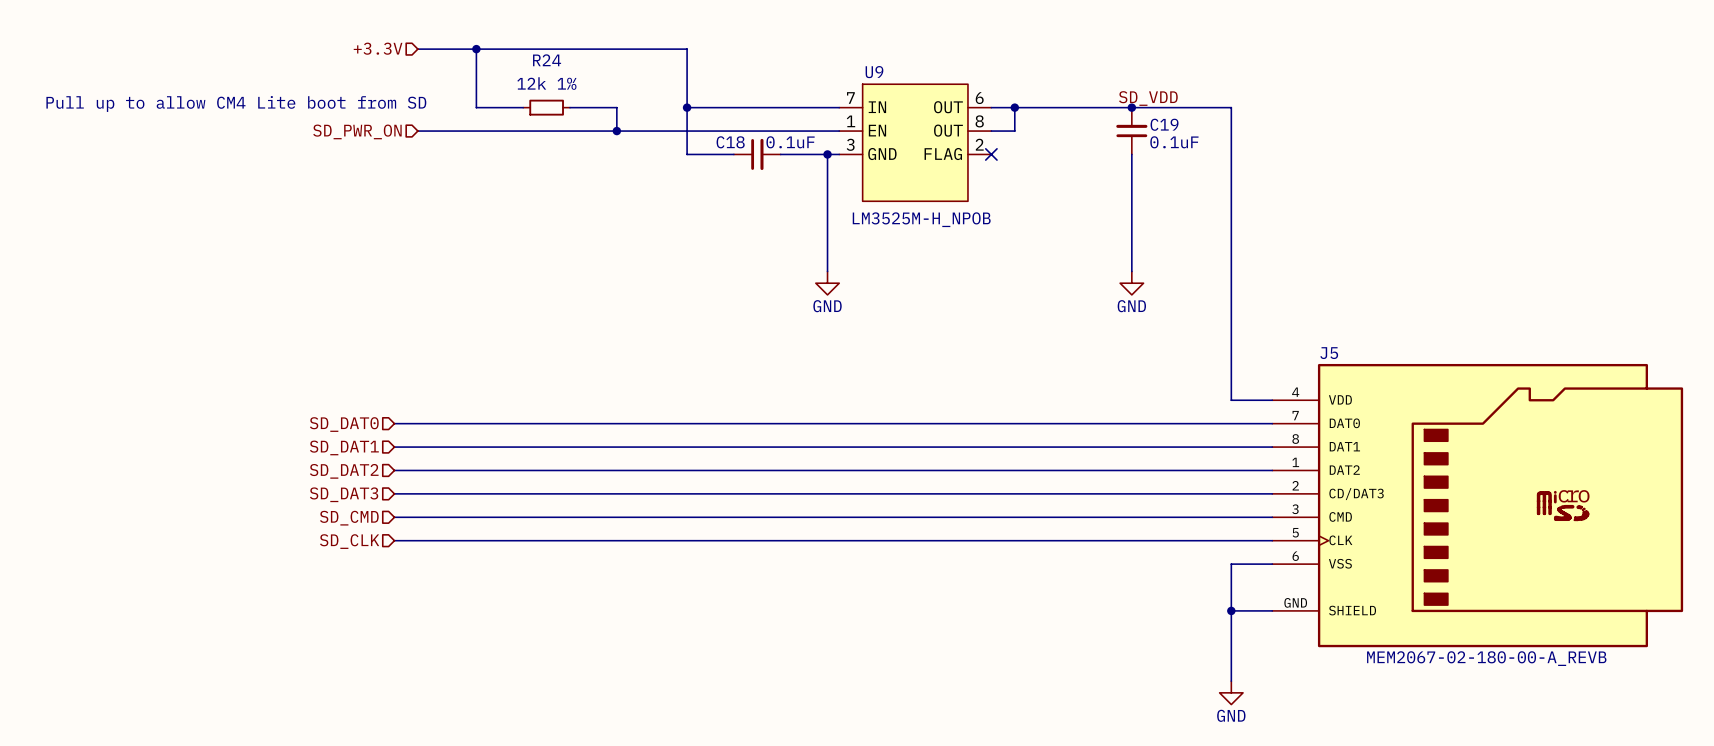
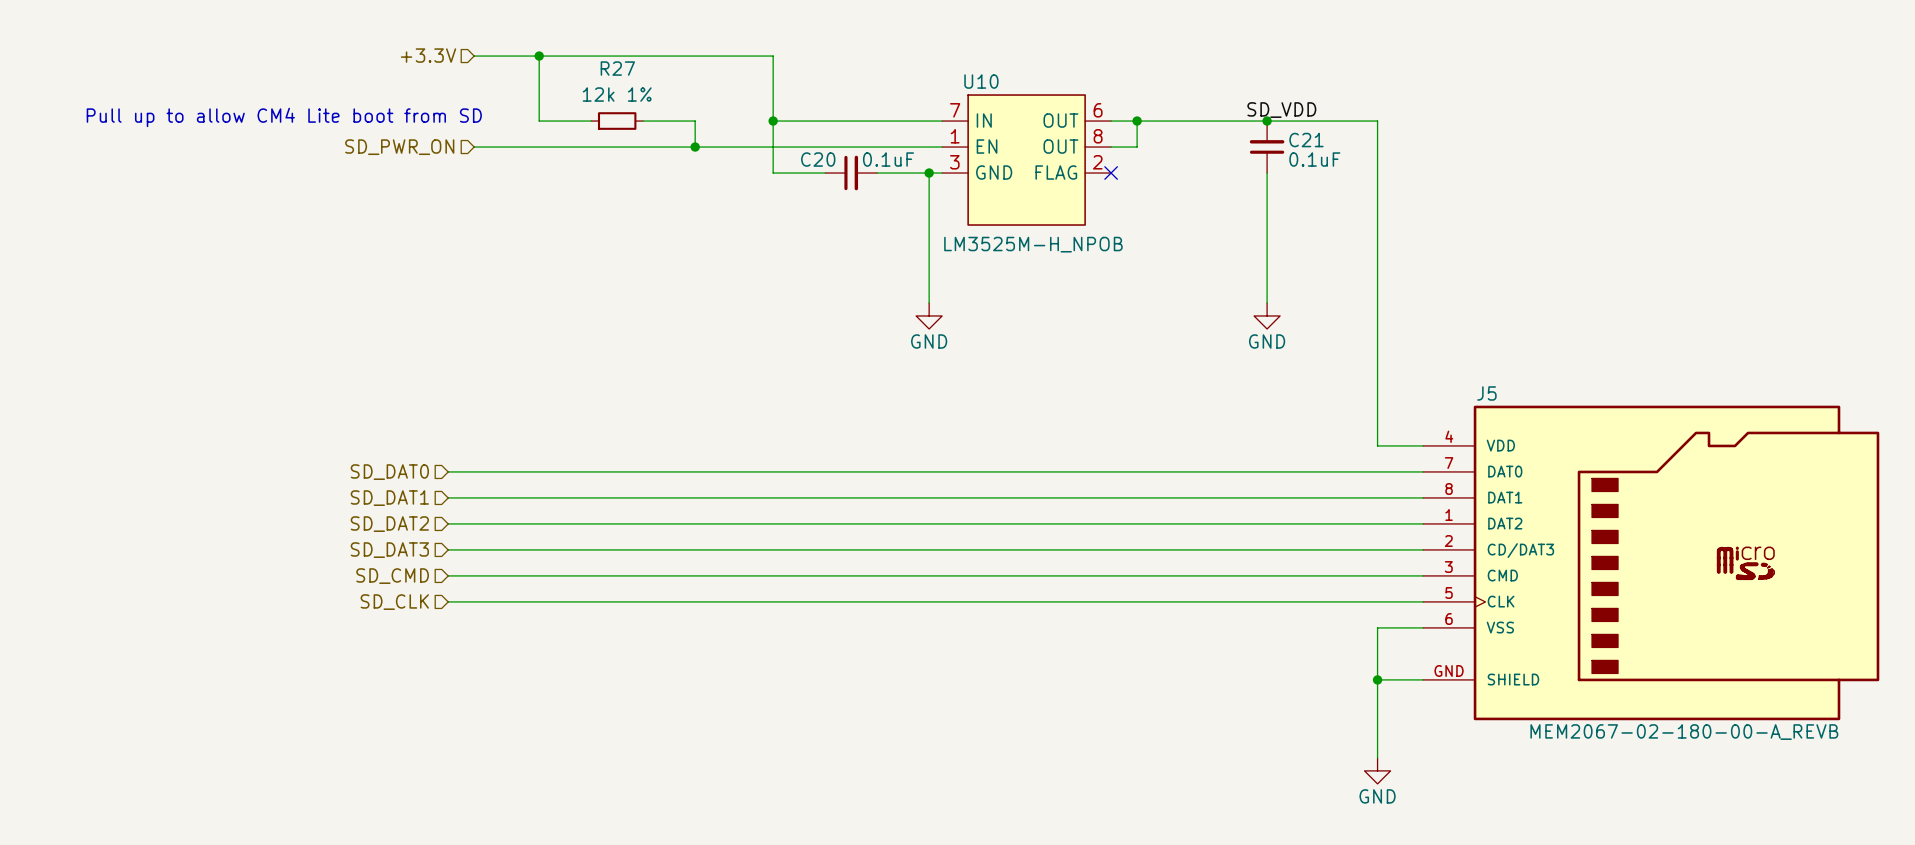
R24 name: R24 (547, 60) -> R27 (617, 68)
U9 name: U9 (874, 72) -> U10 (981, 81)
C19 name: C19 (1164, 124) -> C21 (1306, 140)
C18 name: C18 (730, 142) -> C20 (818, 159)

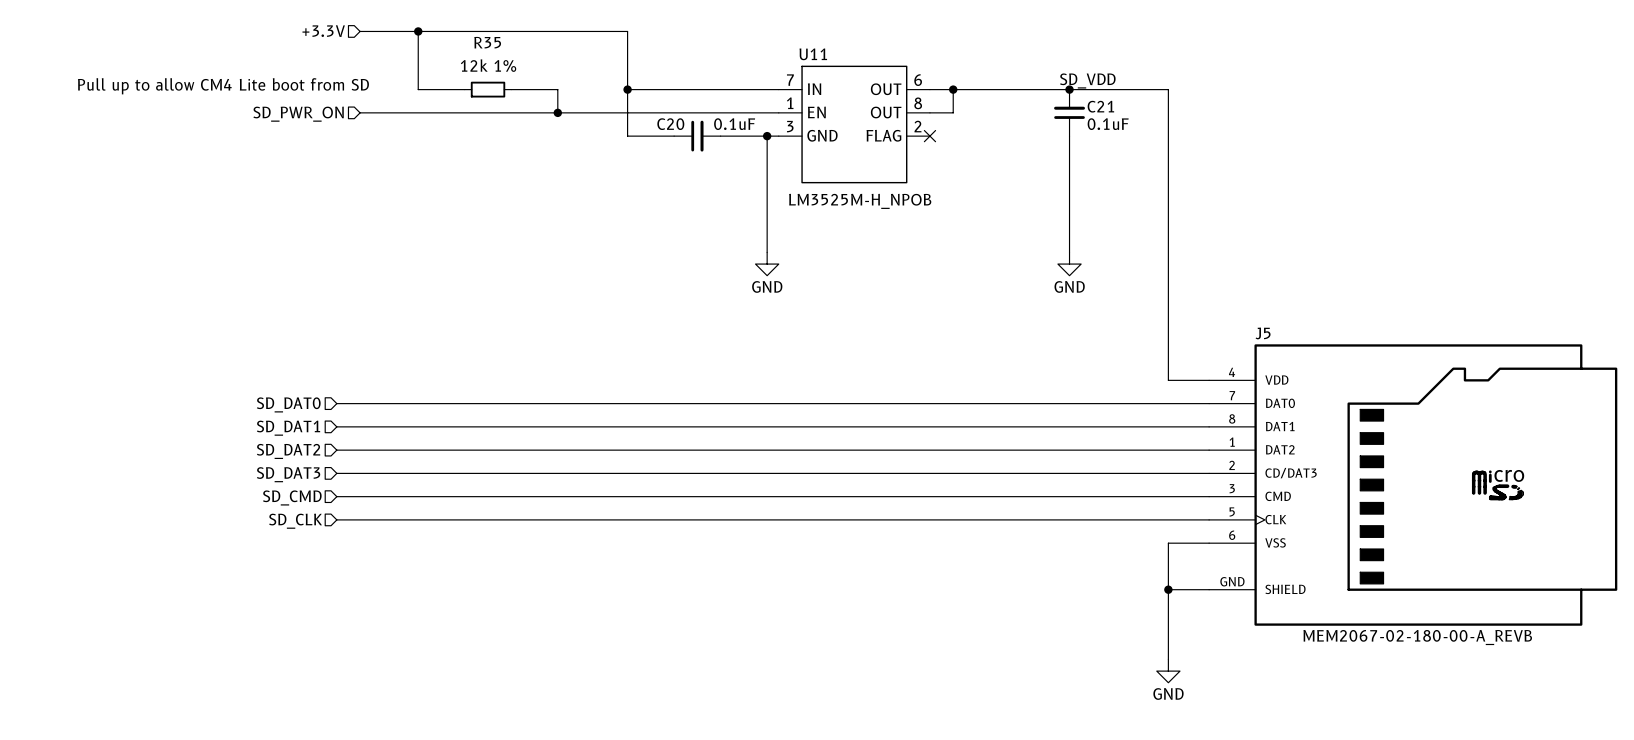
R27 name: R27 (617, 68) -> R35 (487, 42)
U10 name: U10 (981, 81) -> U11 (813, 54)

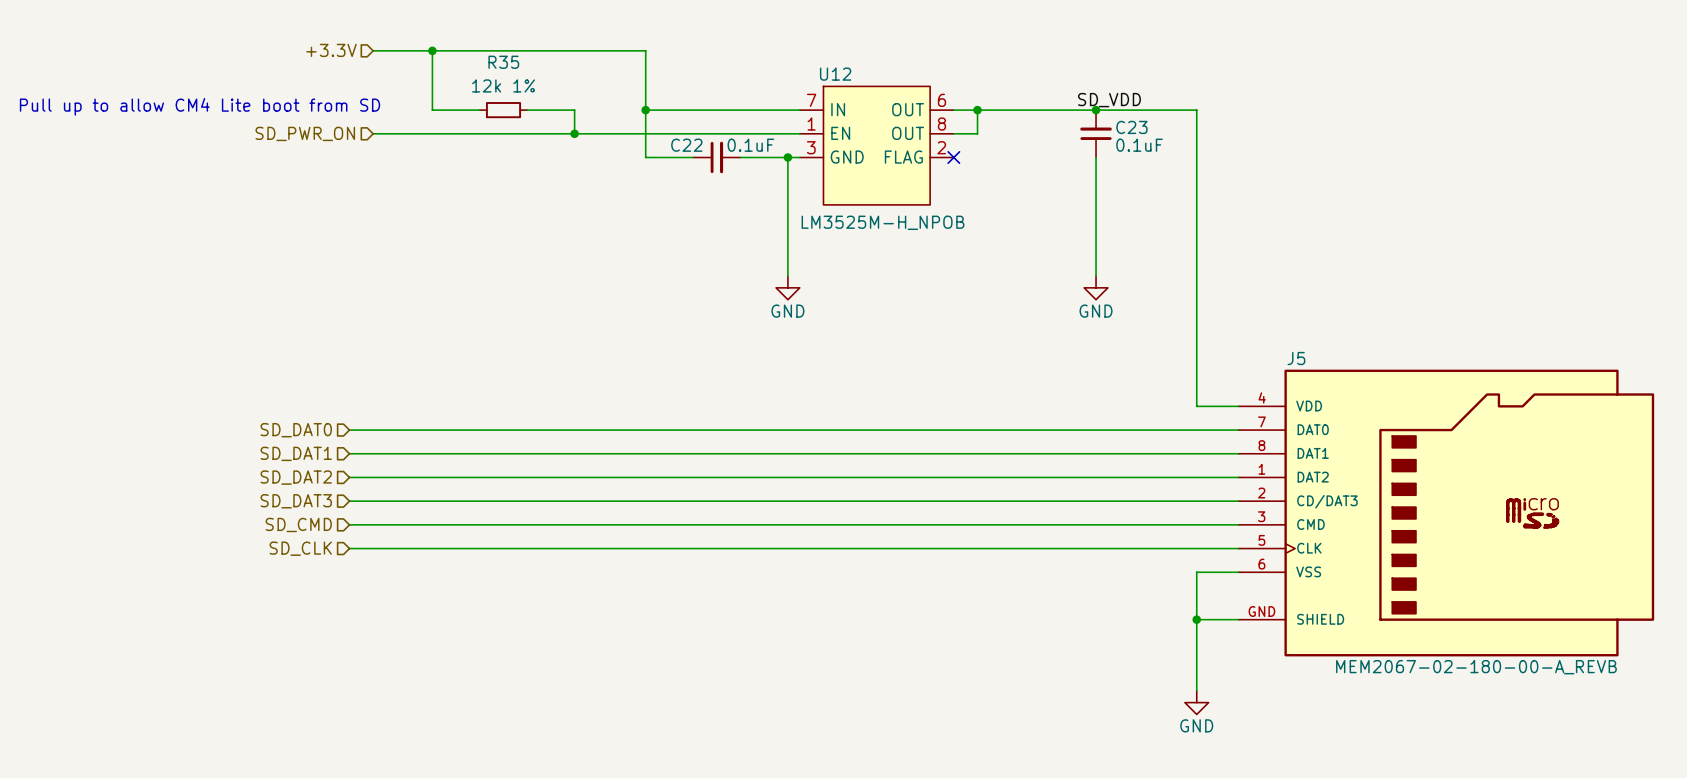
U11 name: U11 (813, 54) -> U12 (835, 74)
C21 name: C21 (1100, 106) -> C23 (1131, 127)
C20 name: C20 (670, 124) -> C22 (686, 145)

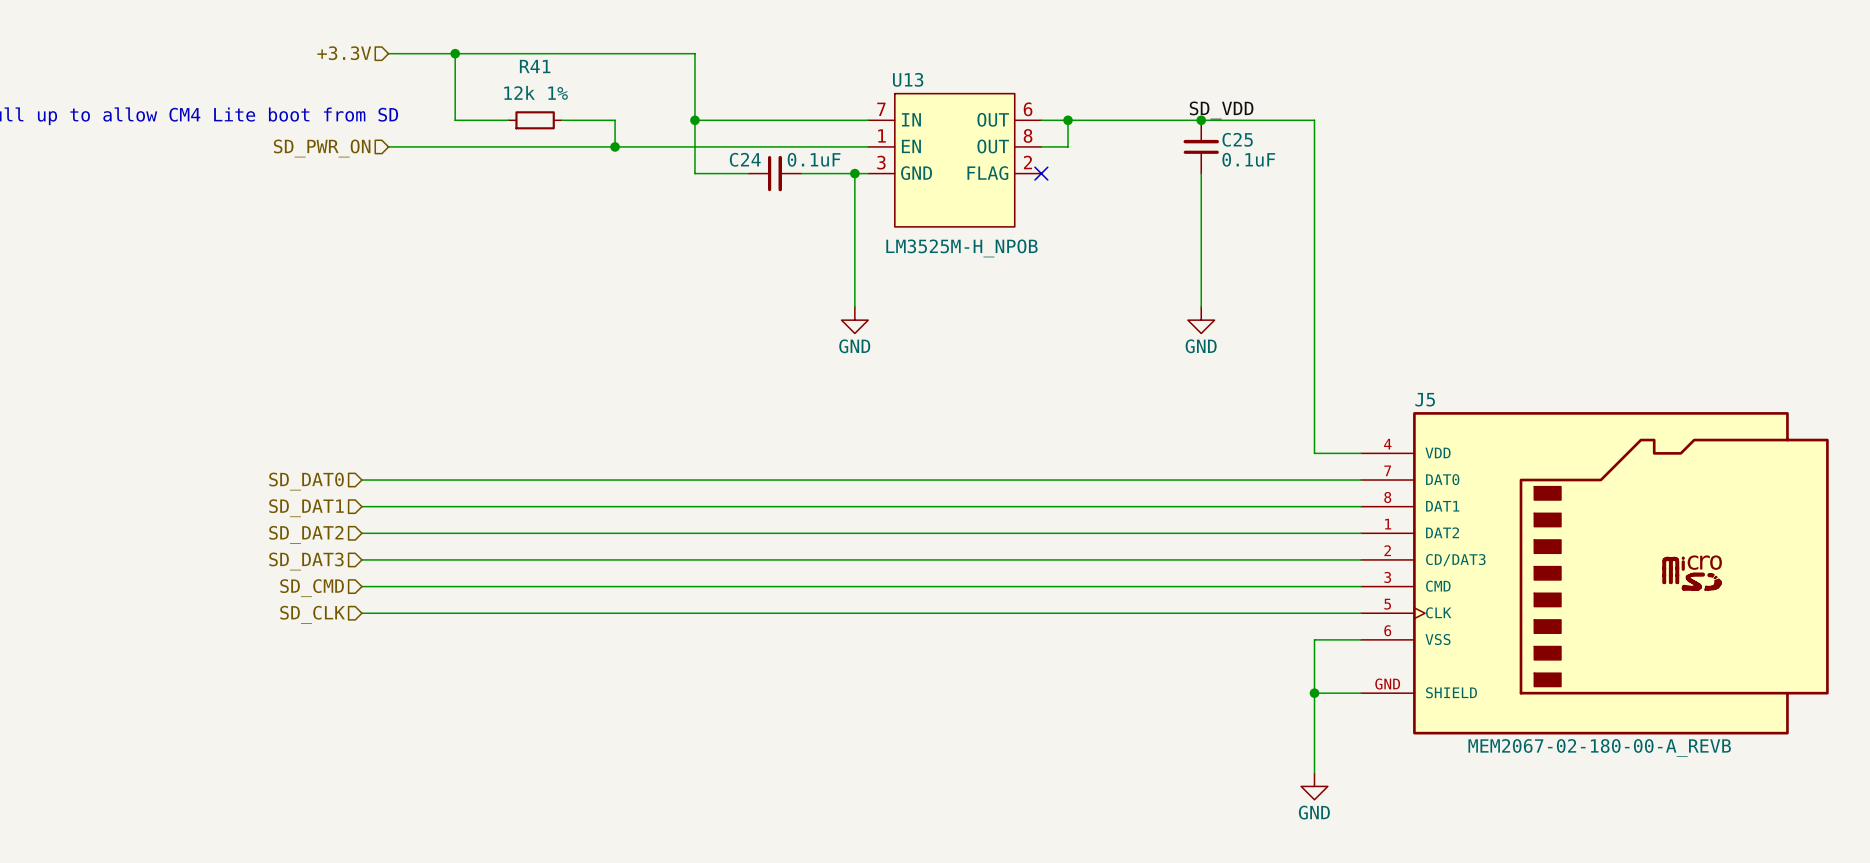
R35 name: R35 (503, 62) -> R41 (535, 66)
U12 name: U12 (835, 74) -> U13 (908, 79)
C23 name: C23 (1131, 127) -> C25 (1237, 139)
C22 name: C22 (686, 145) -> C24 (745, 159)

